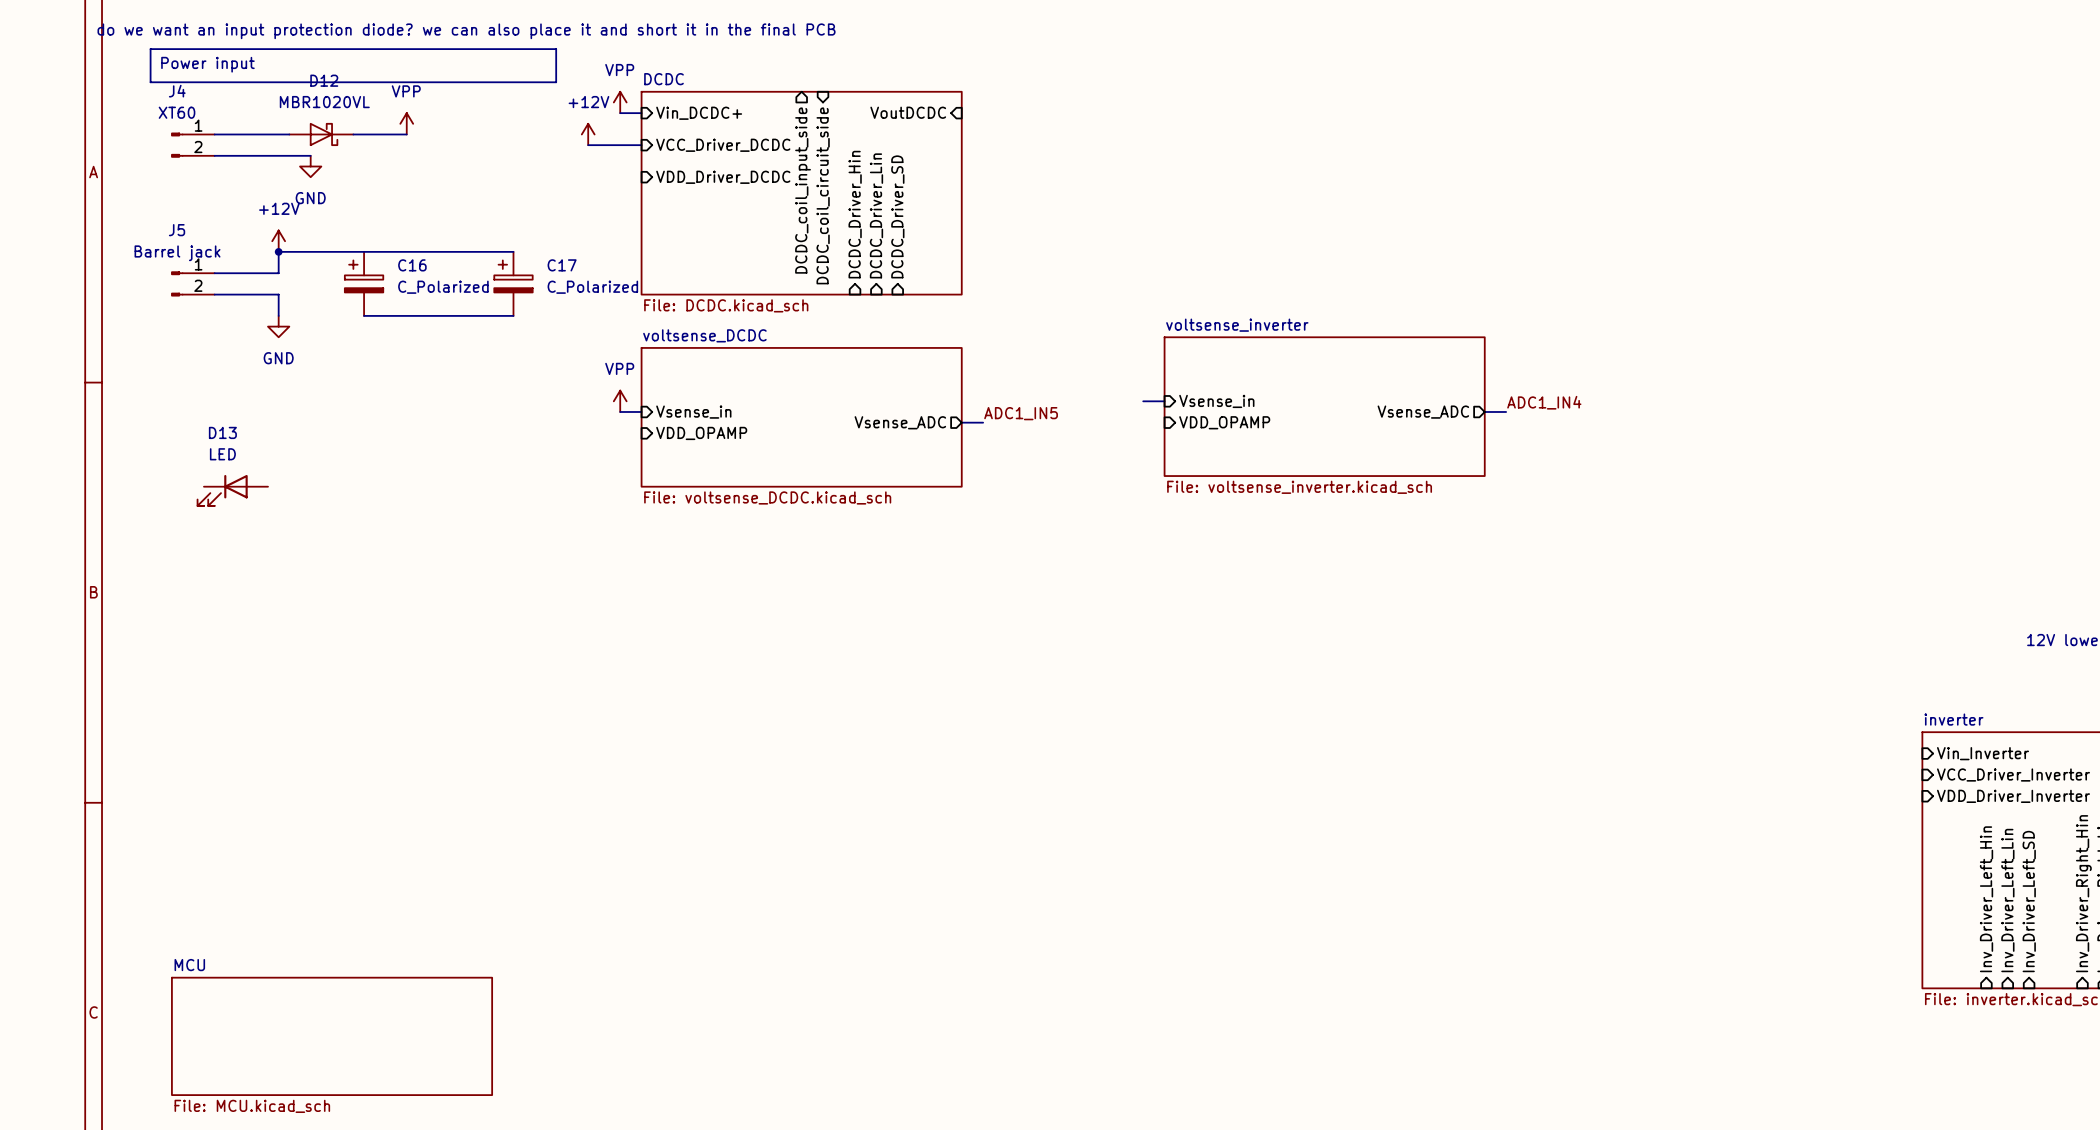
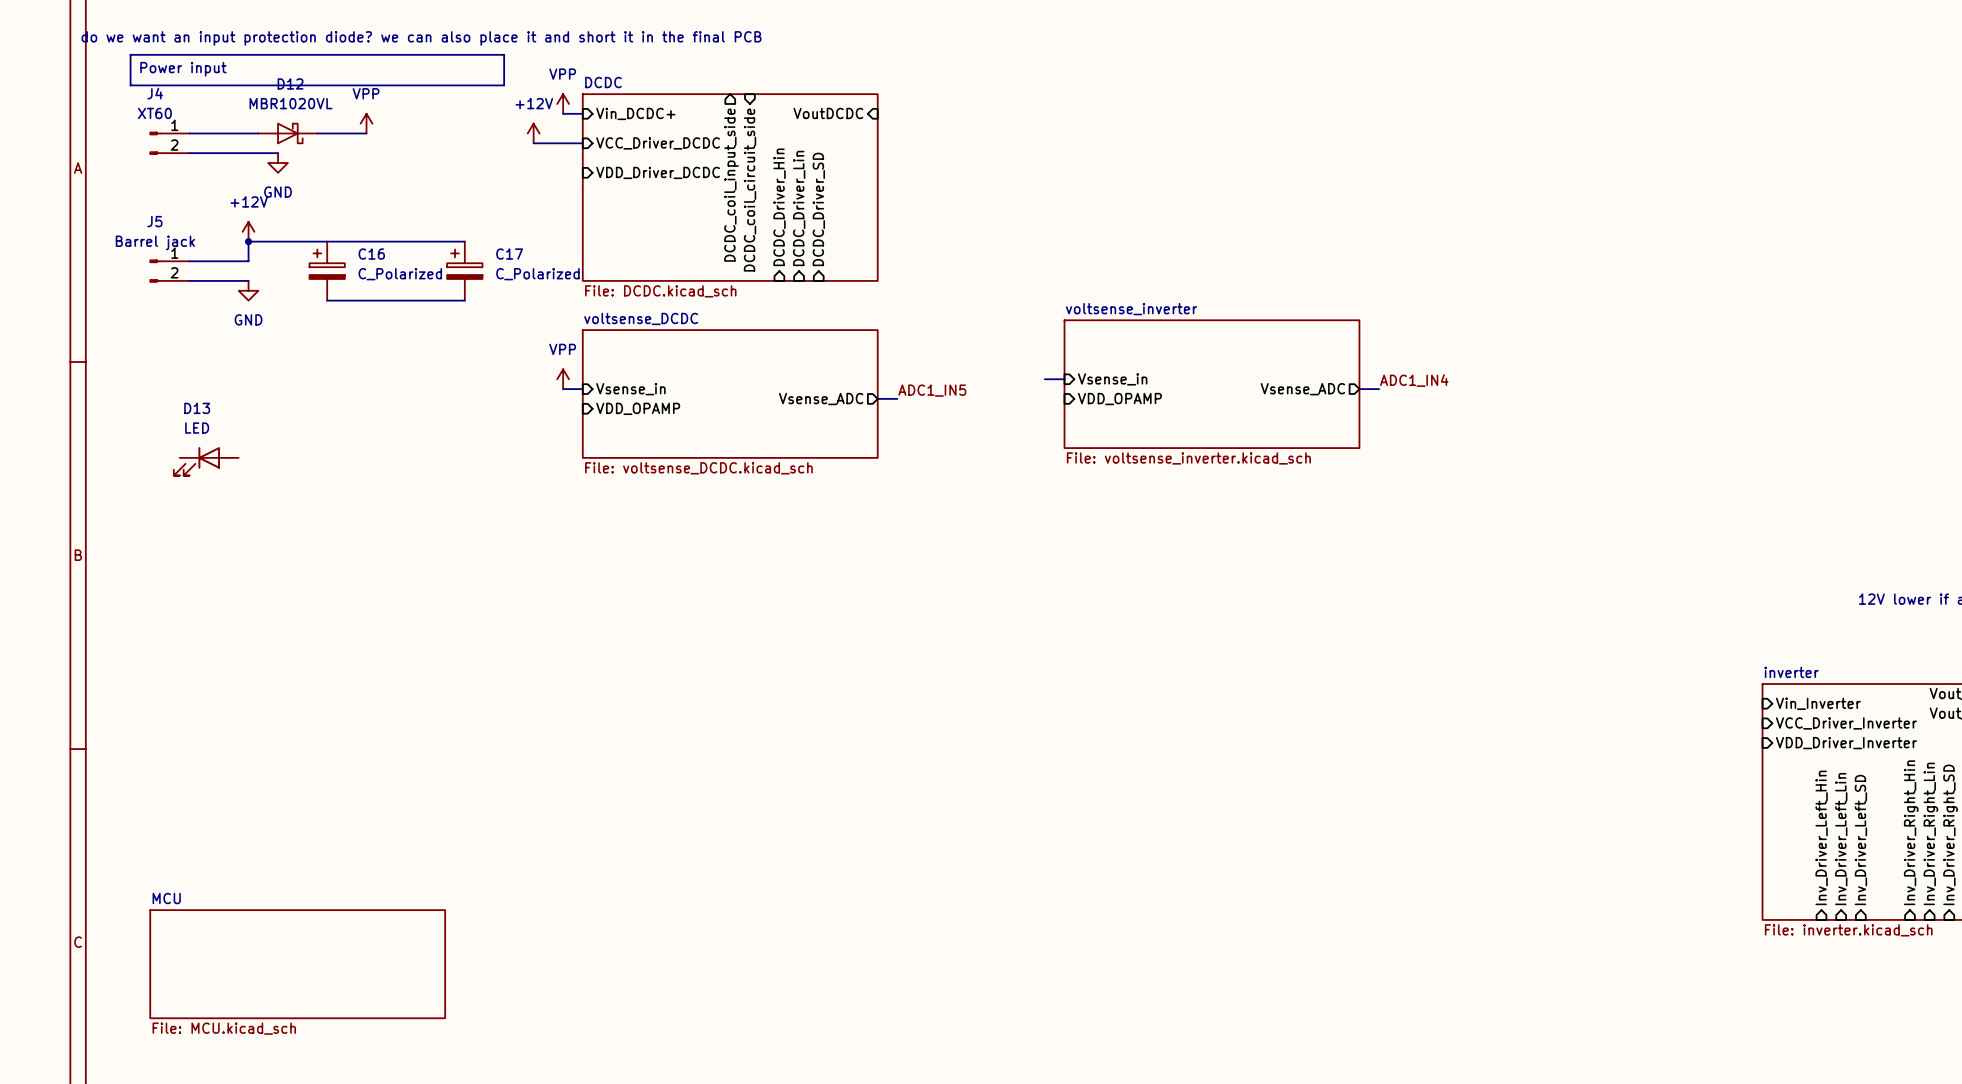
power symbol position: GND (278, 326) -> GND (248, 290)

